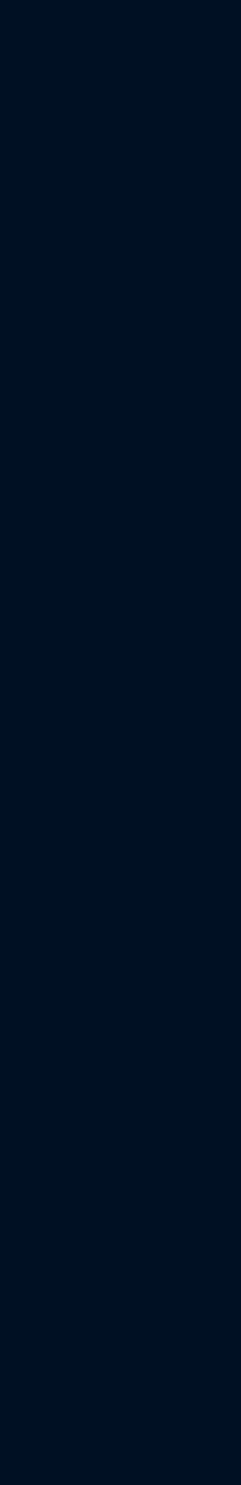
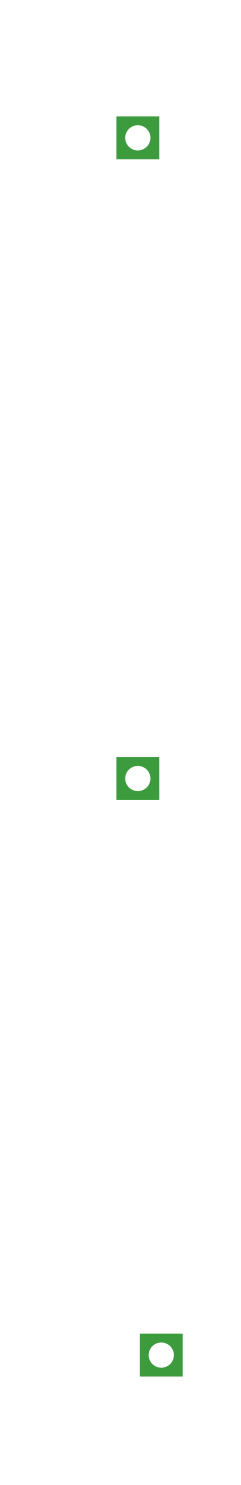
part: none -> (137, 137)
part: none -> (137, 778)
part: none -> (161, 1355)

